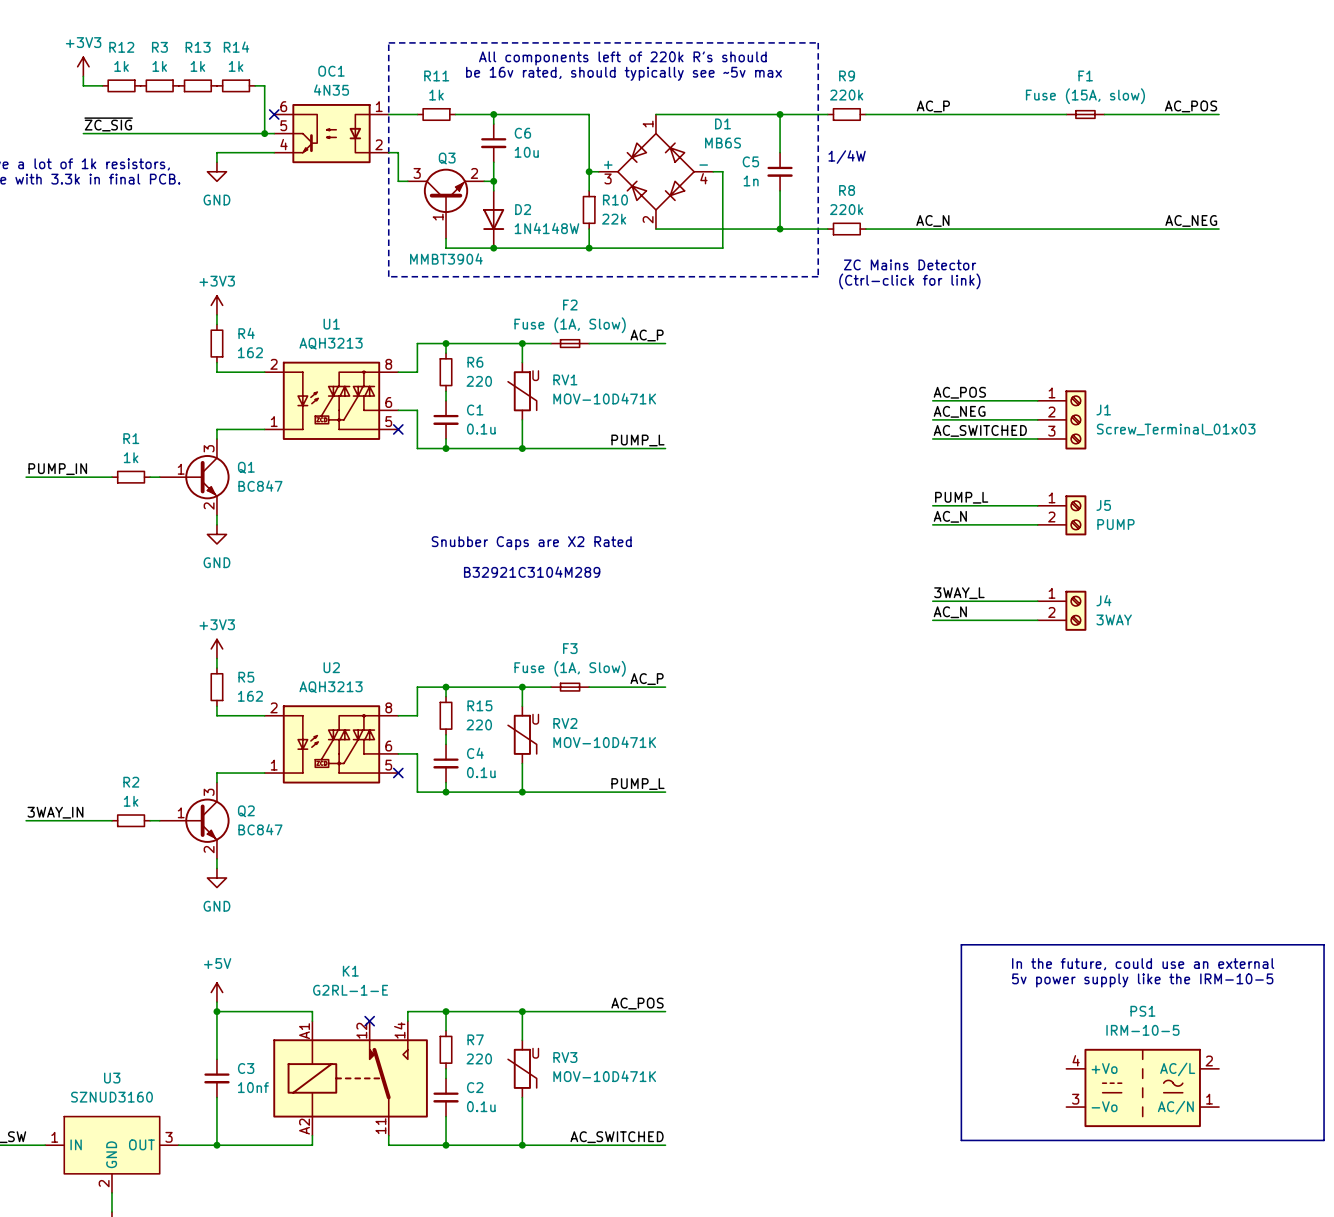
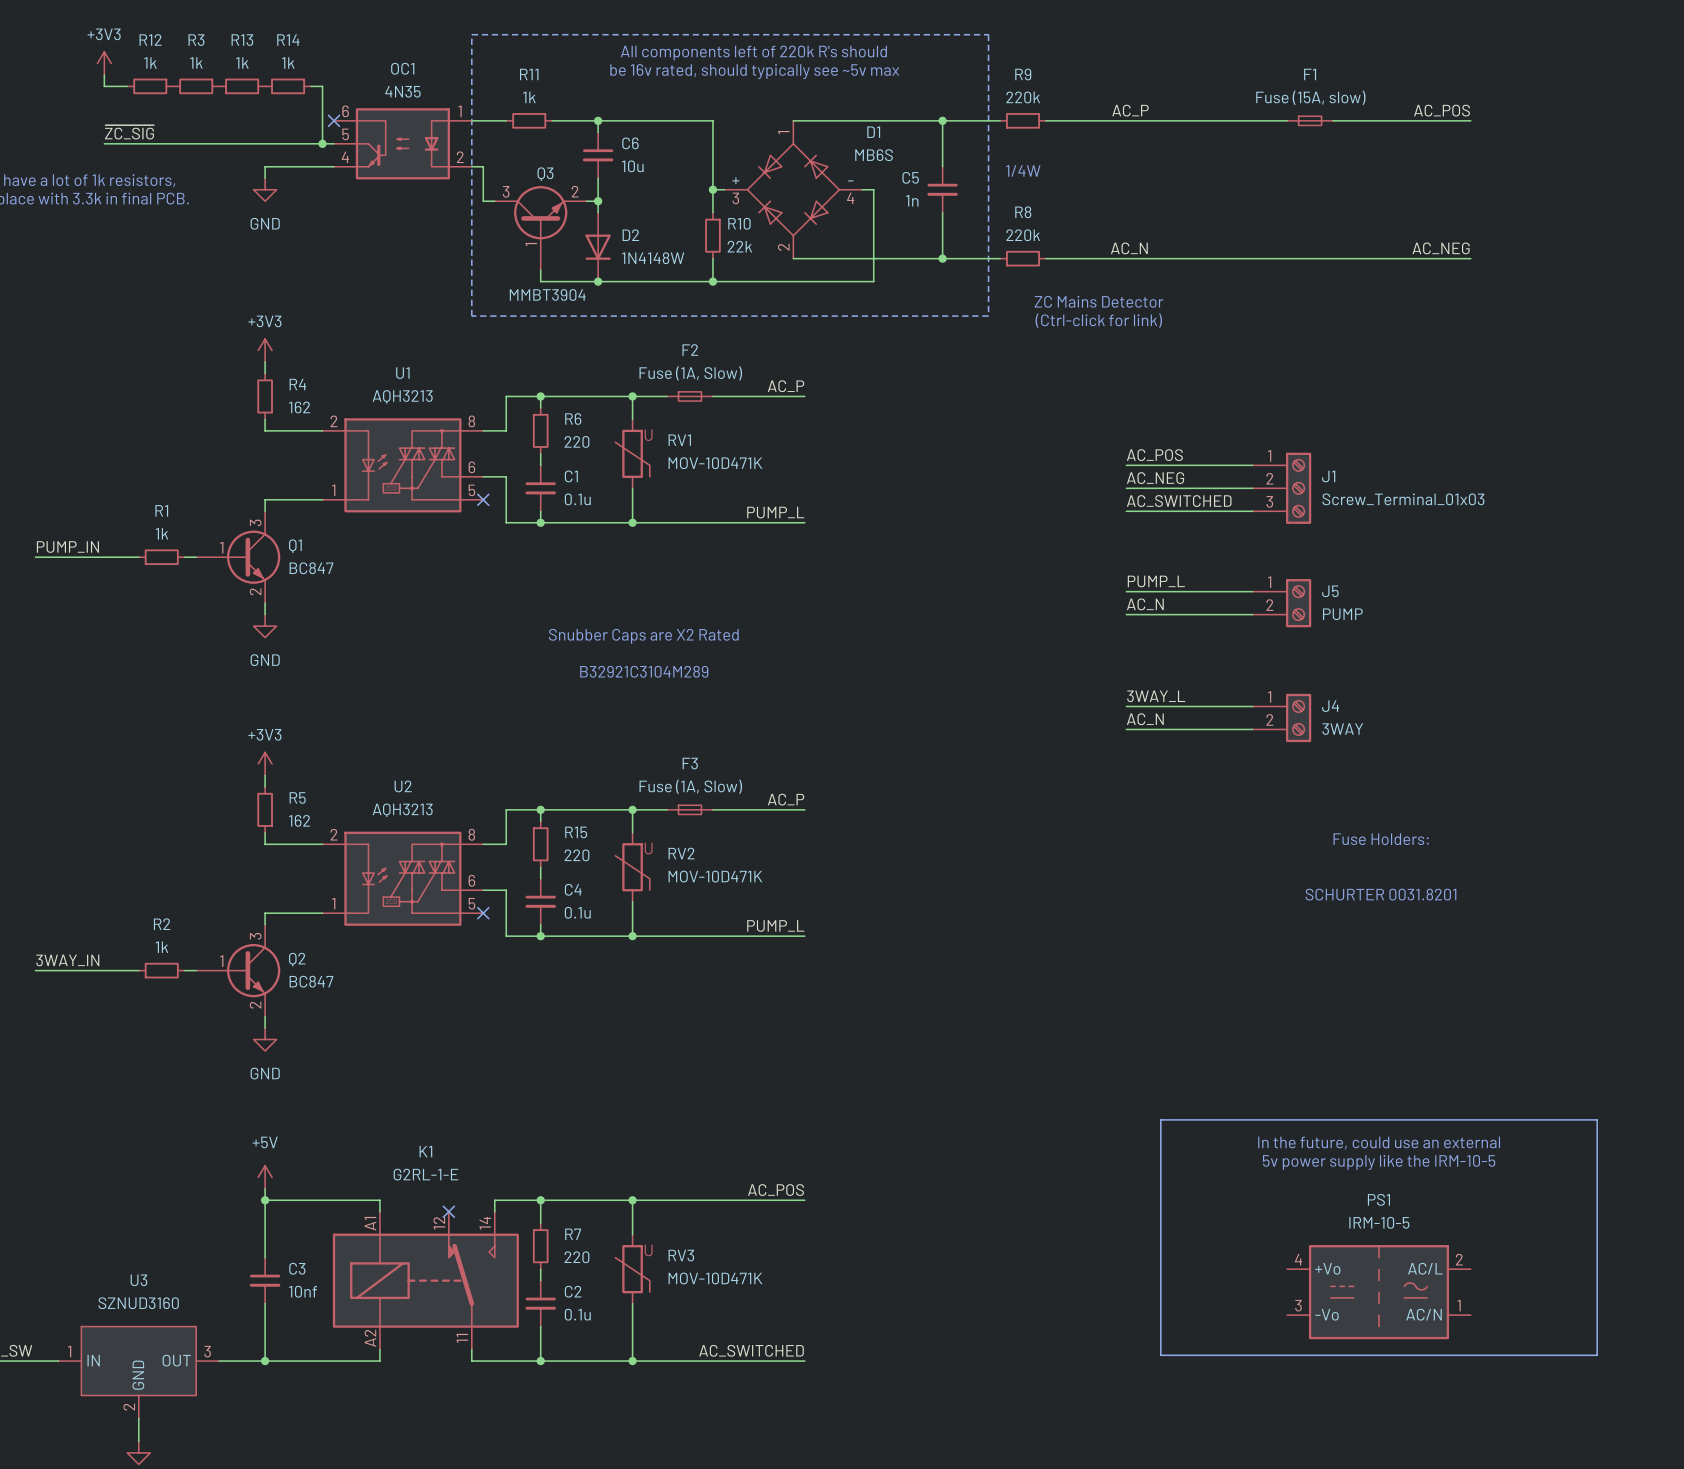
text: none -> Fuse Holders: (1381, 839)
text: none -> SCHURTER 0031.8201 (1380, 894)

